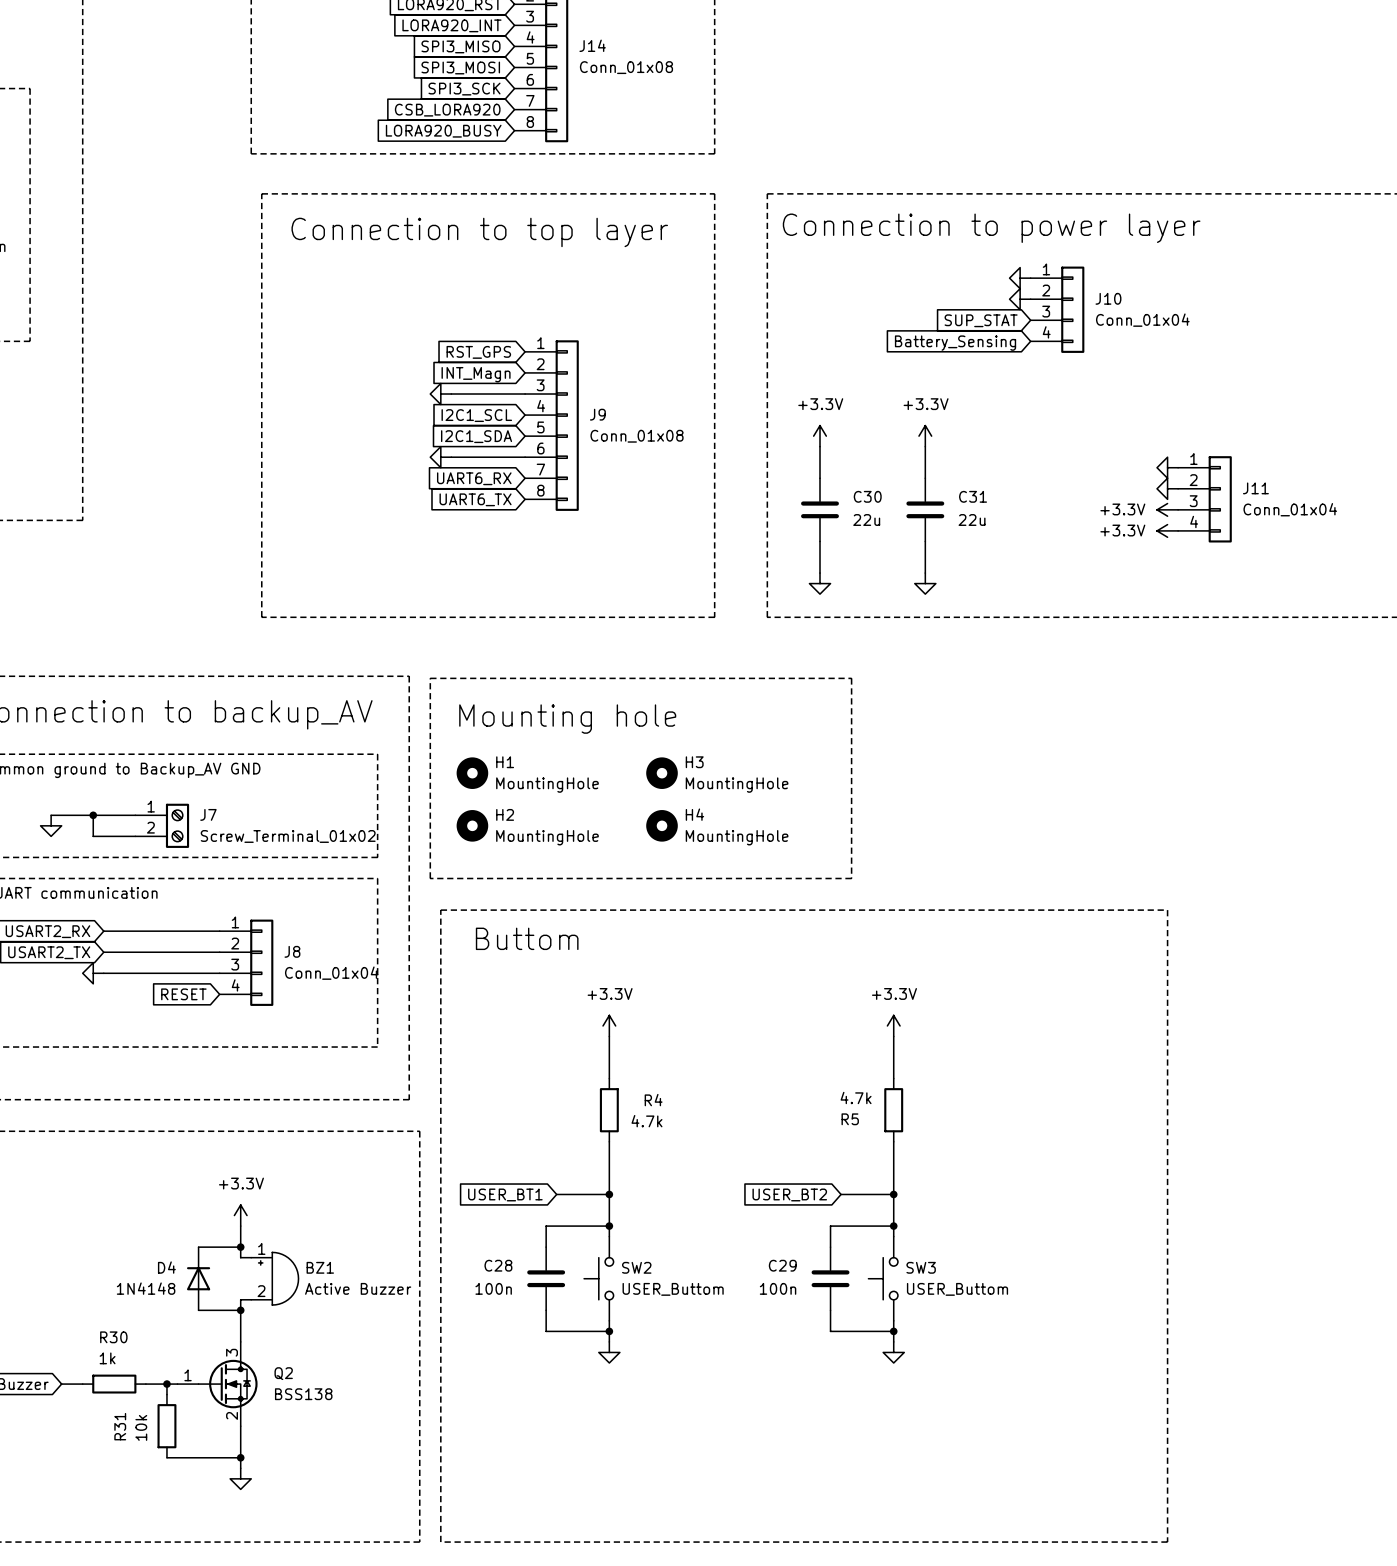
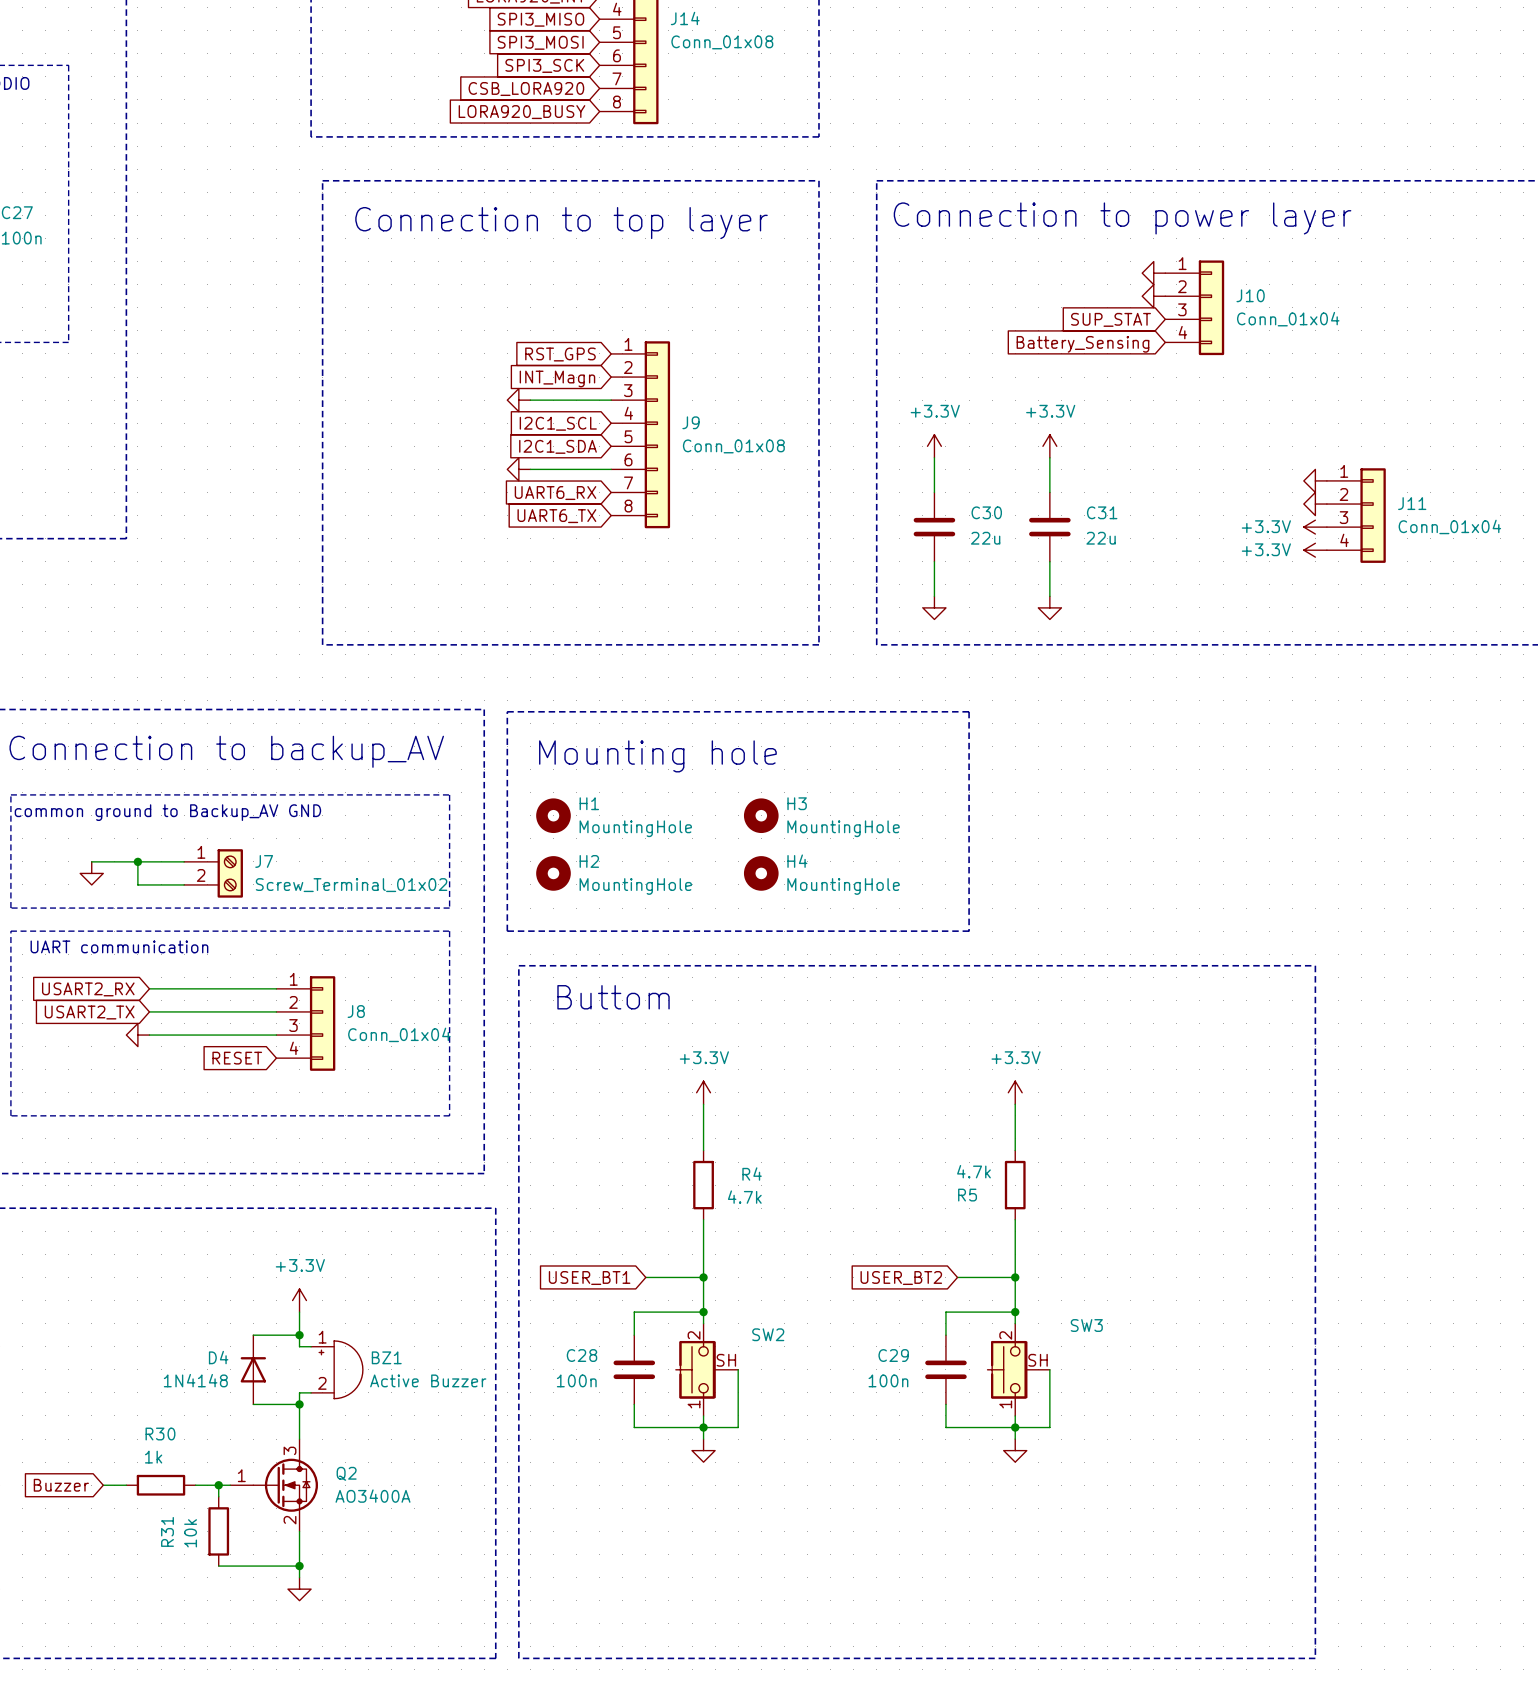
SW2 symbol: [584, 1236, 614, 1321] -> [675, 1323, 739, 1416]
SW3 symbol: [868, 1236, 898, 1321] -> [987, 1323, 1050, 1416]
SW2 name position: SW2 (636, 1267) -> SW2 (768, 1334)
SW3 name position: SW3 (921, 1267) -> SW3 (1086, 1325)
wire: none -> (738, 1369) (738, 1427) (703, 1427)
wire: none -> (1049, 1369) (1049, 1427) (1015, 1427)
SW2 value: USER_Buttom (673, 1289) -> none
SW3 value: USER_Buttom (957, 1289) -> none
Q2 value: BSS138 (303, 1394) -> AO3400A (372, 1496)

